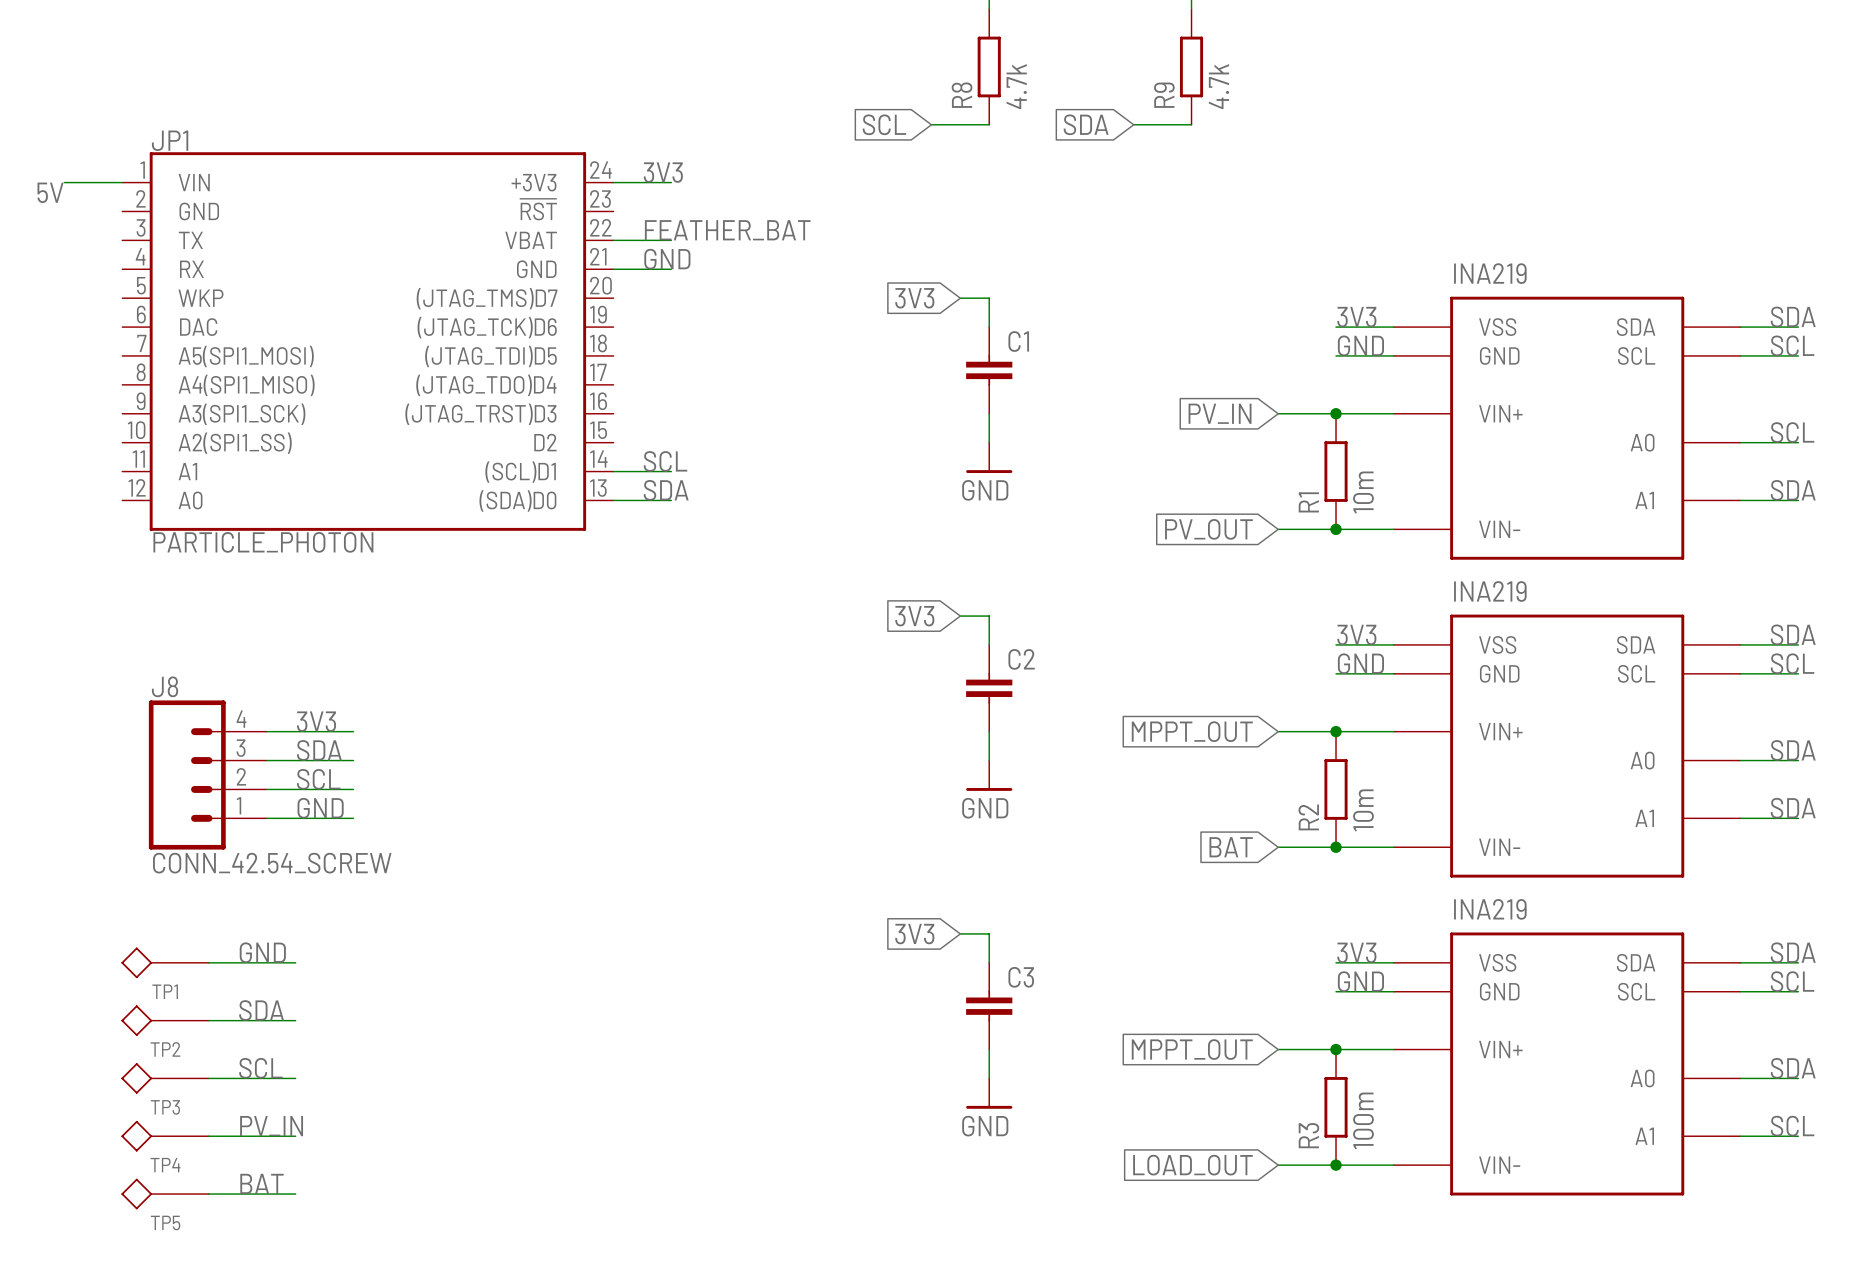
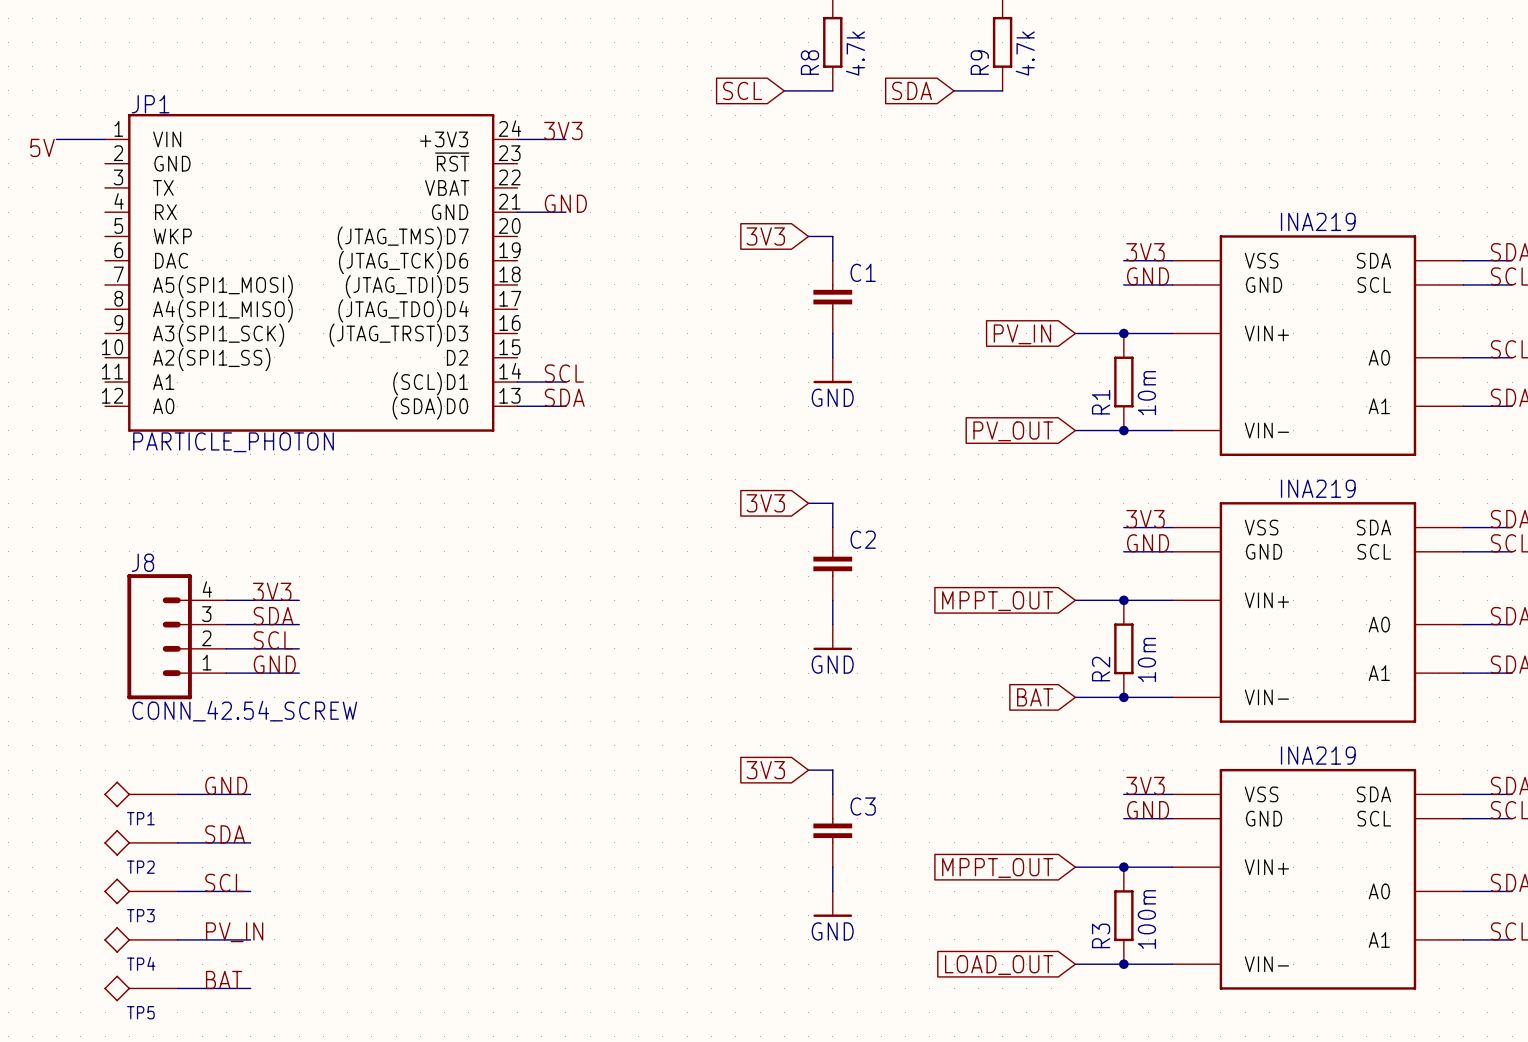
label: FEATHER_BAT (727, 230) -> none
wire: (613, 240) (671, 240) -> none
part text position: INA219 (1490, 273) -> INA219 (1318, 221)
part text position: INA219 (1490, 591) -> INA219 (1318, 488)
part text position: INA219 (1490, 909) -> INA219 (1318, 755)

